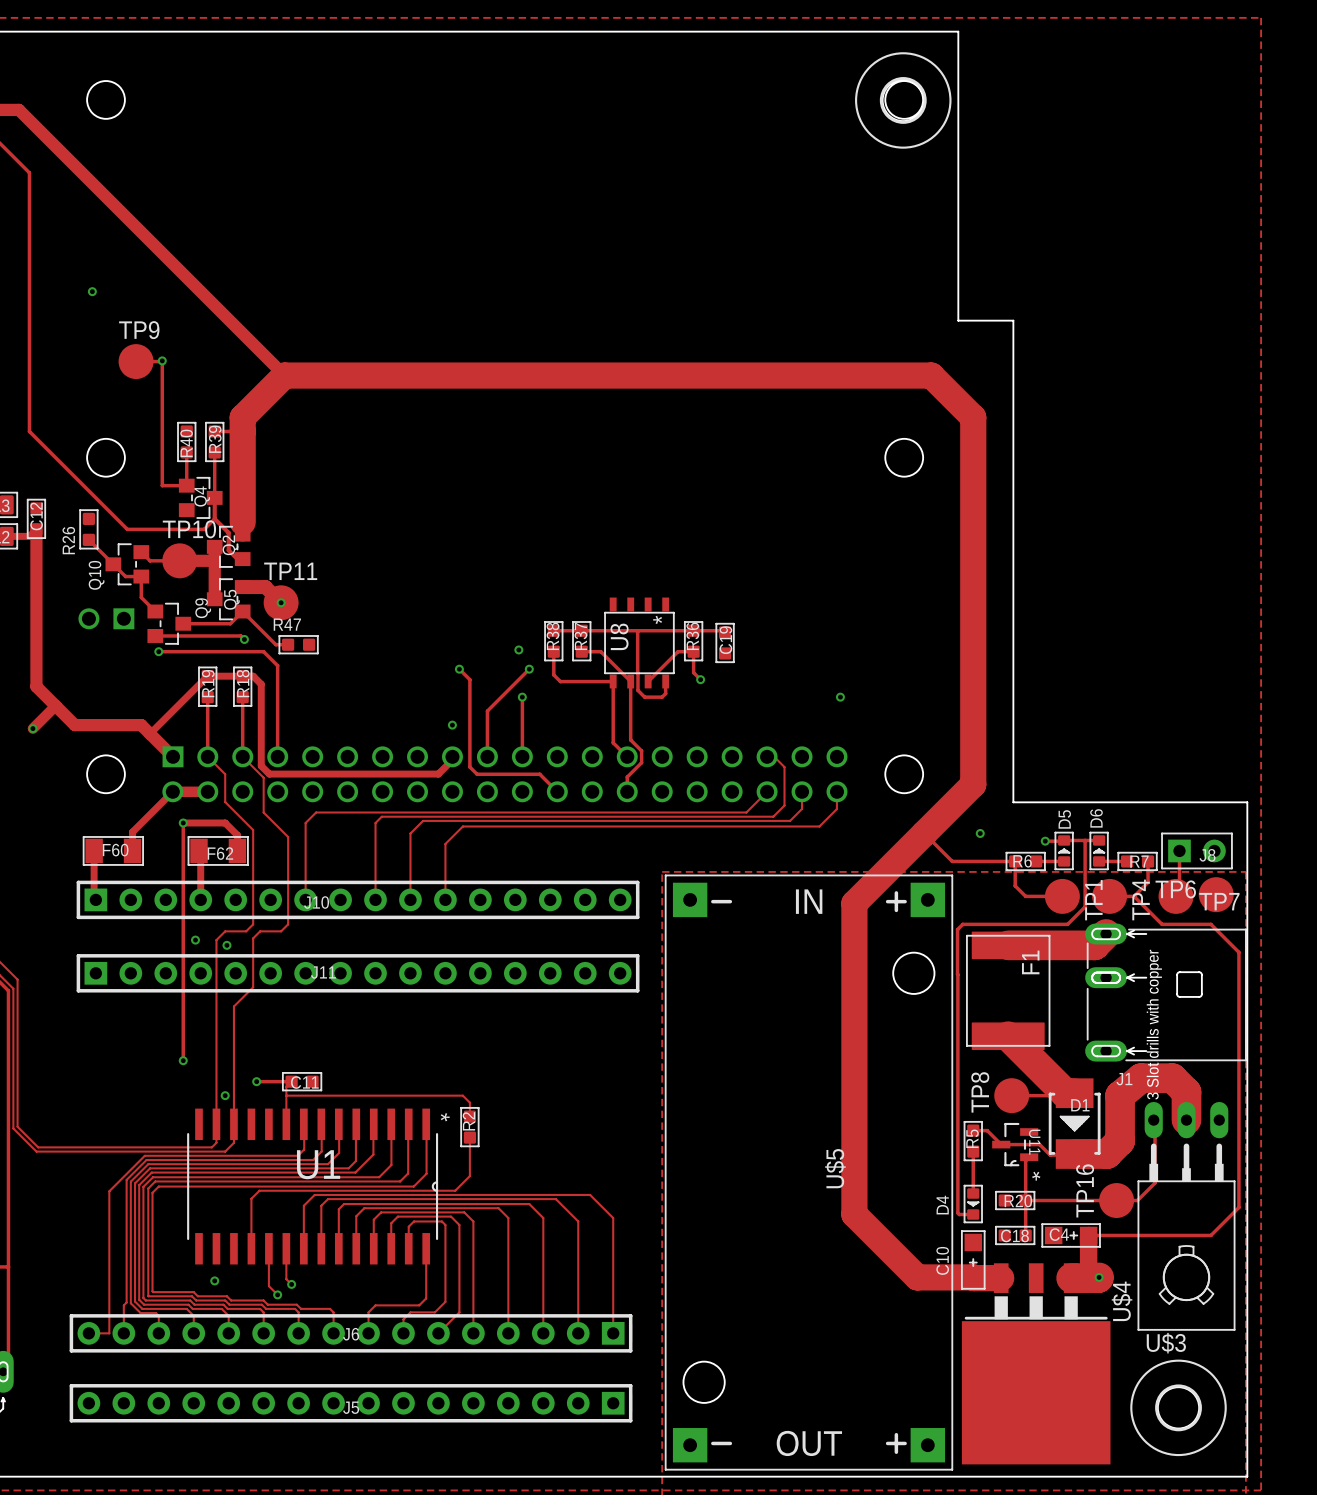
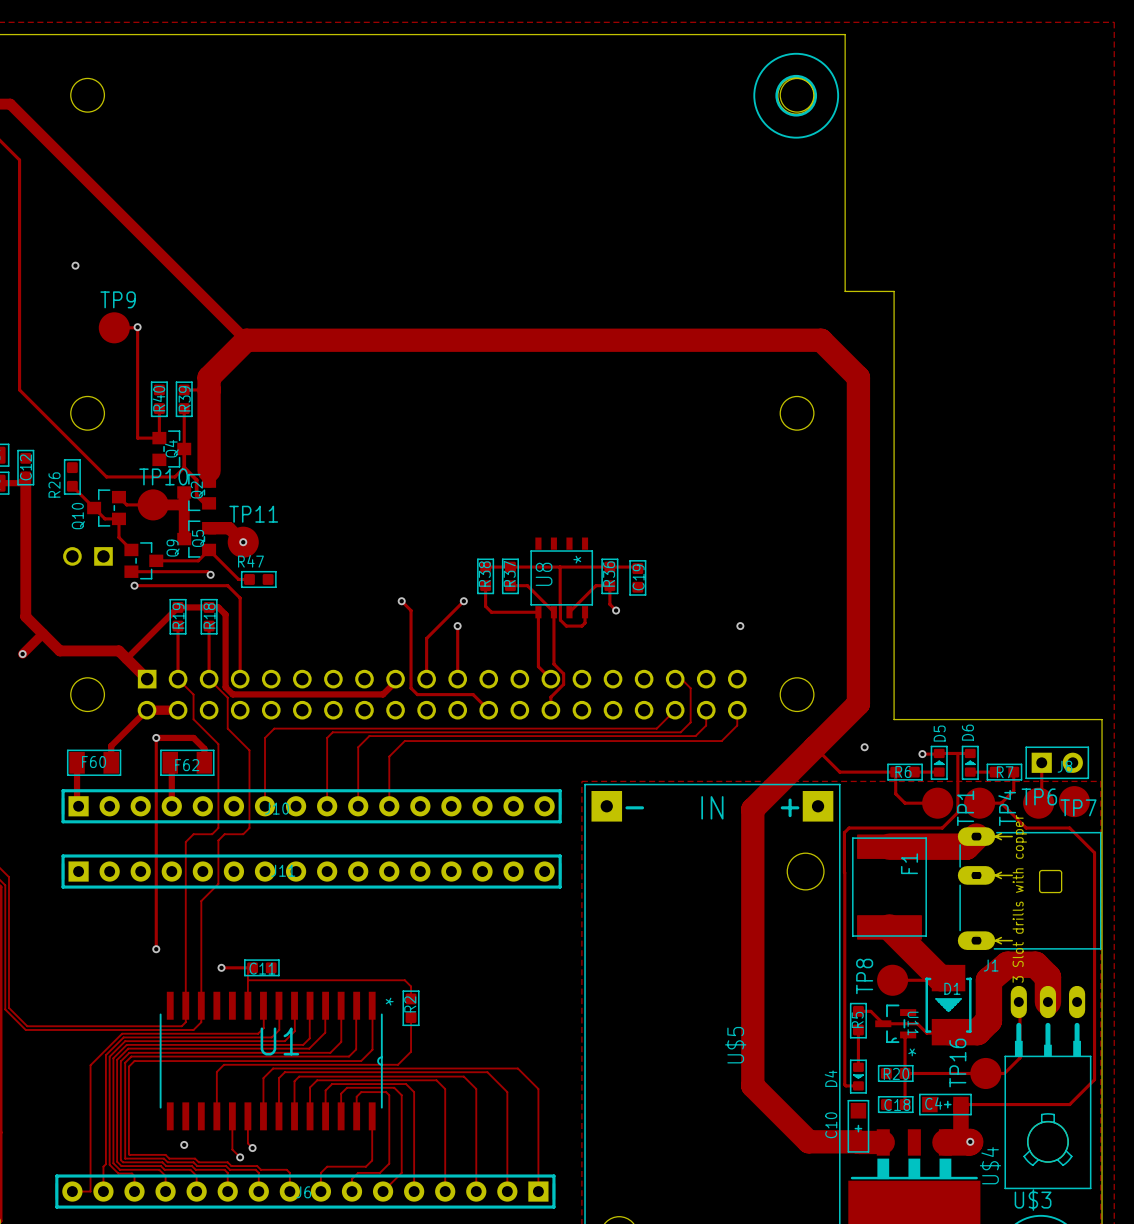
via: (518, 649) -> none
via: (452, 725) -> none
via: (195, 940) -> none
via: (226, 945) -> none
via: (225, 1095) -> none

